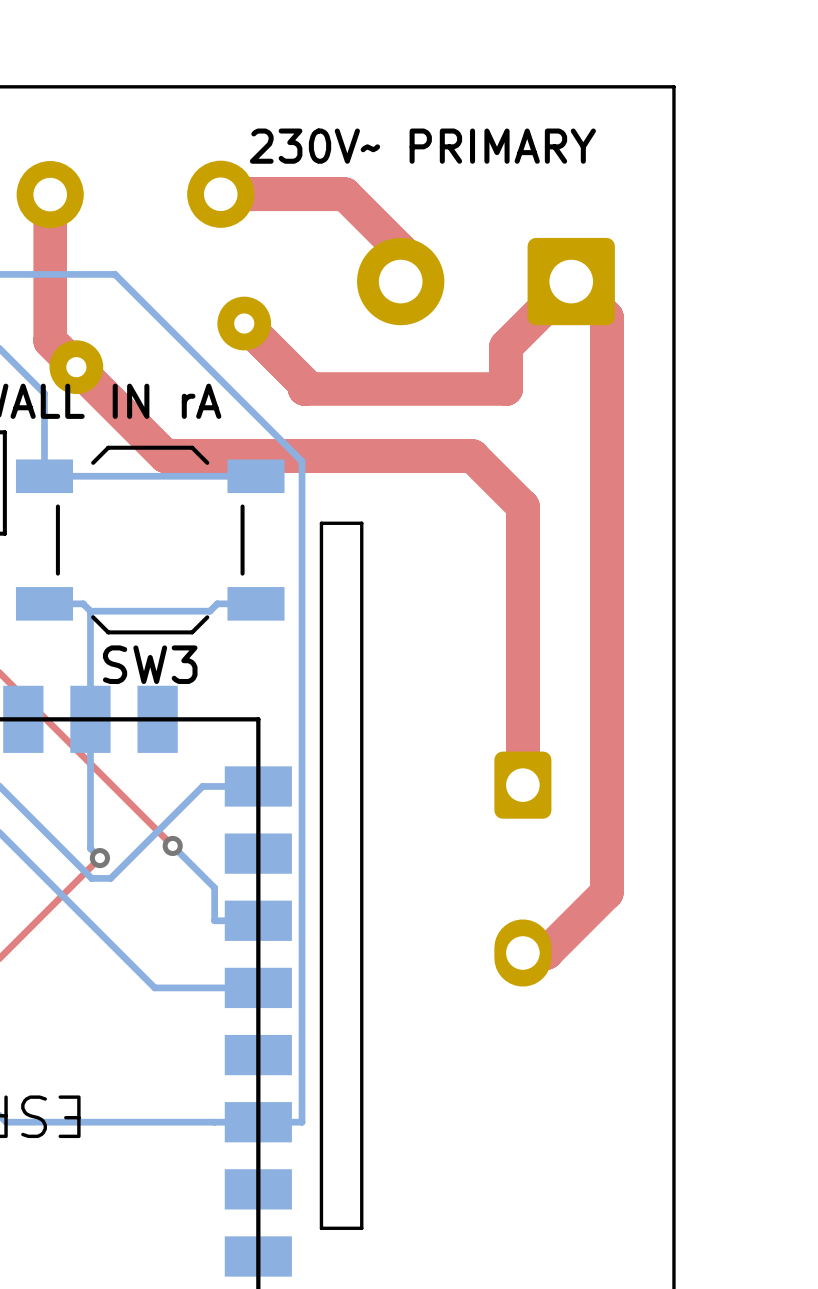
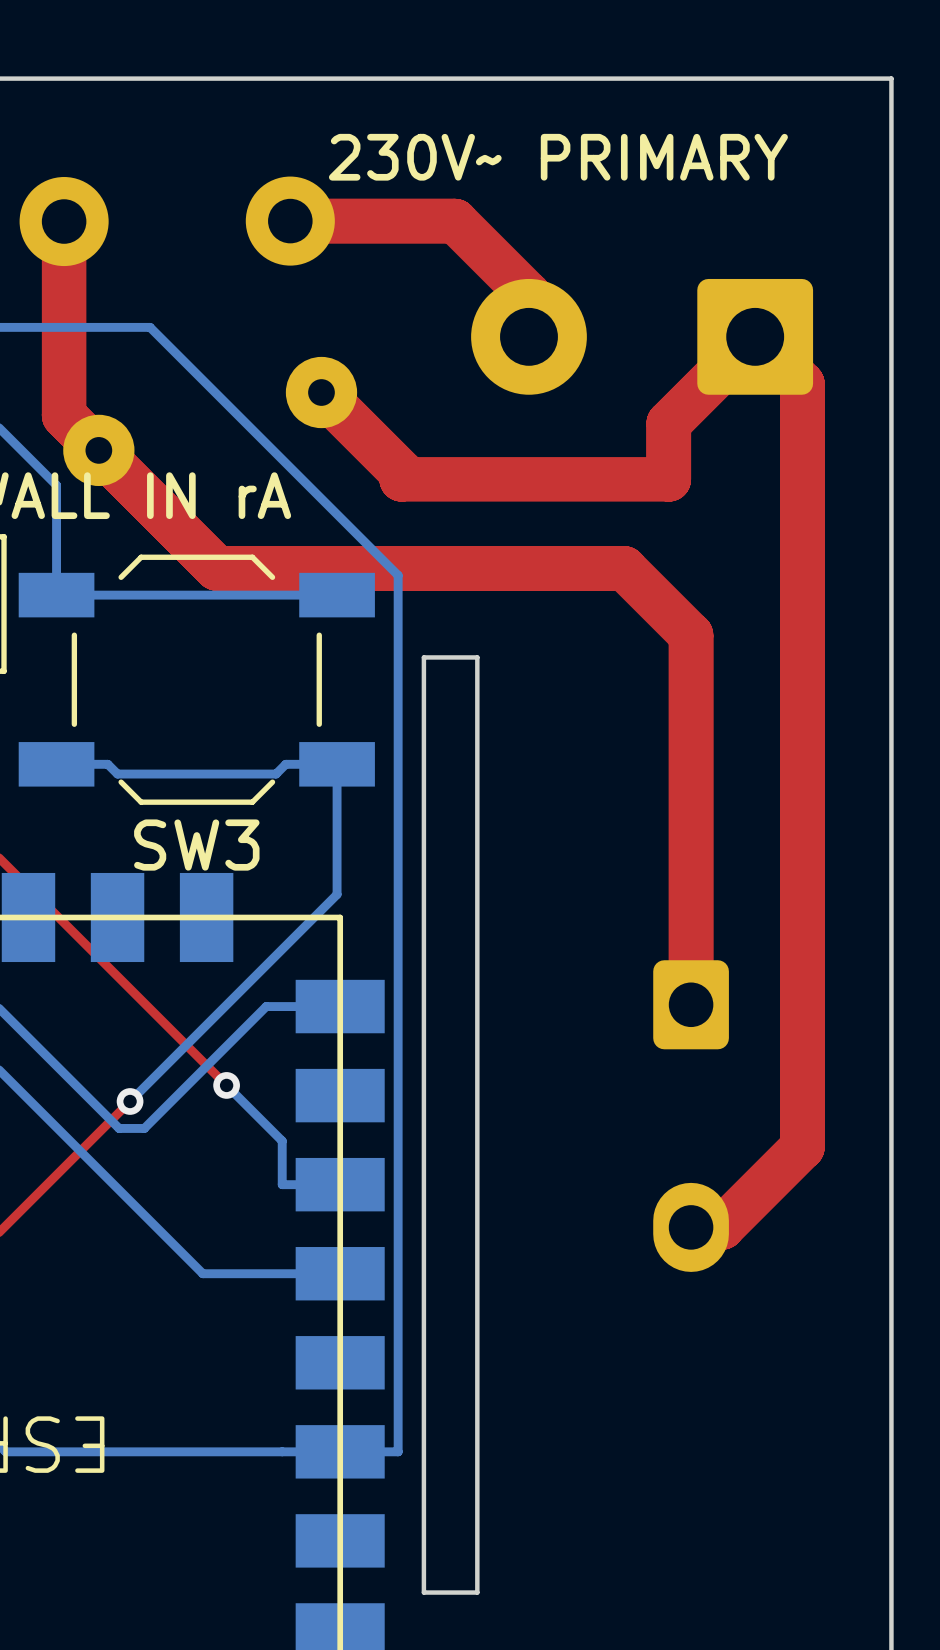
bottom track: (90, 611) (90, 848) (99, 858) -> (337, 764) (337, 894) (130, 1101)

